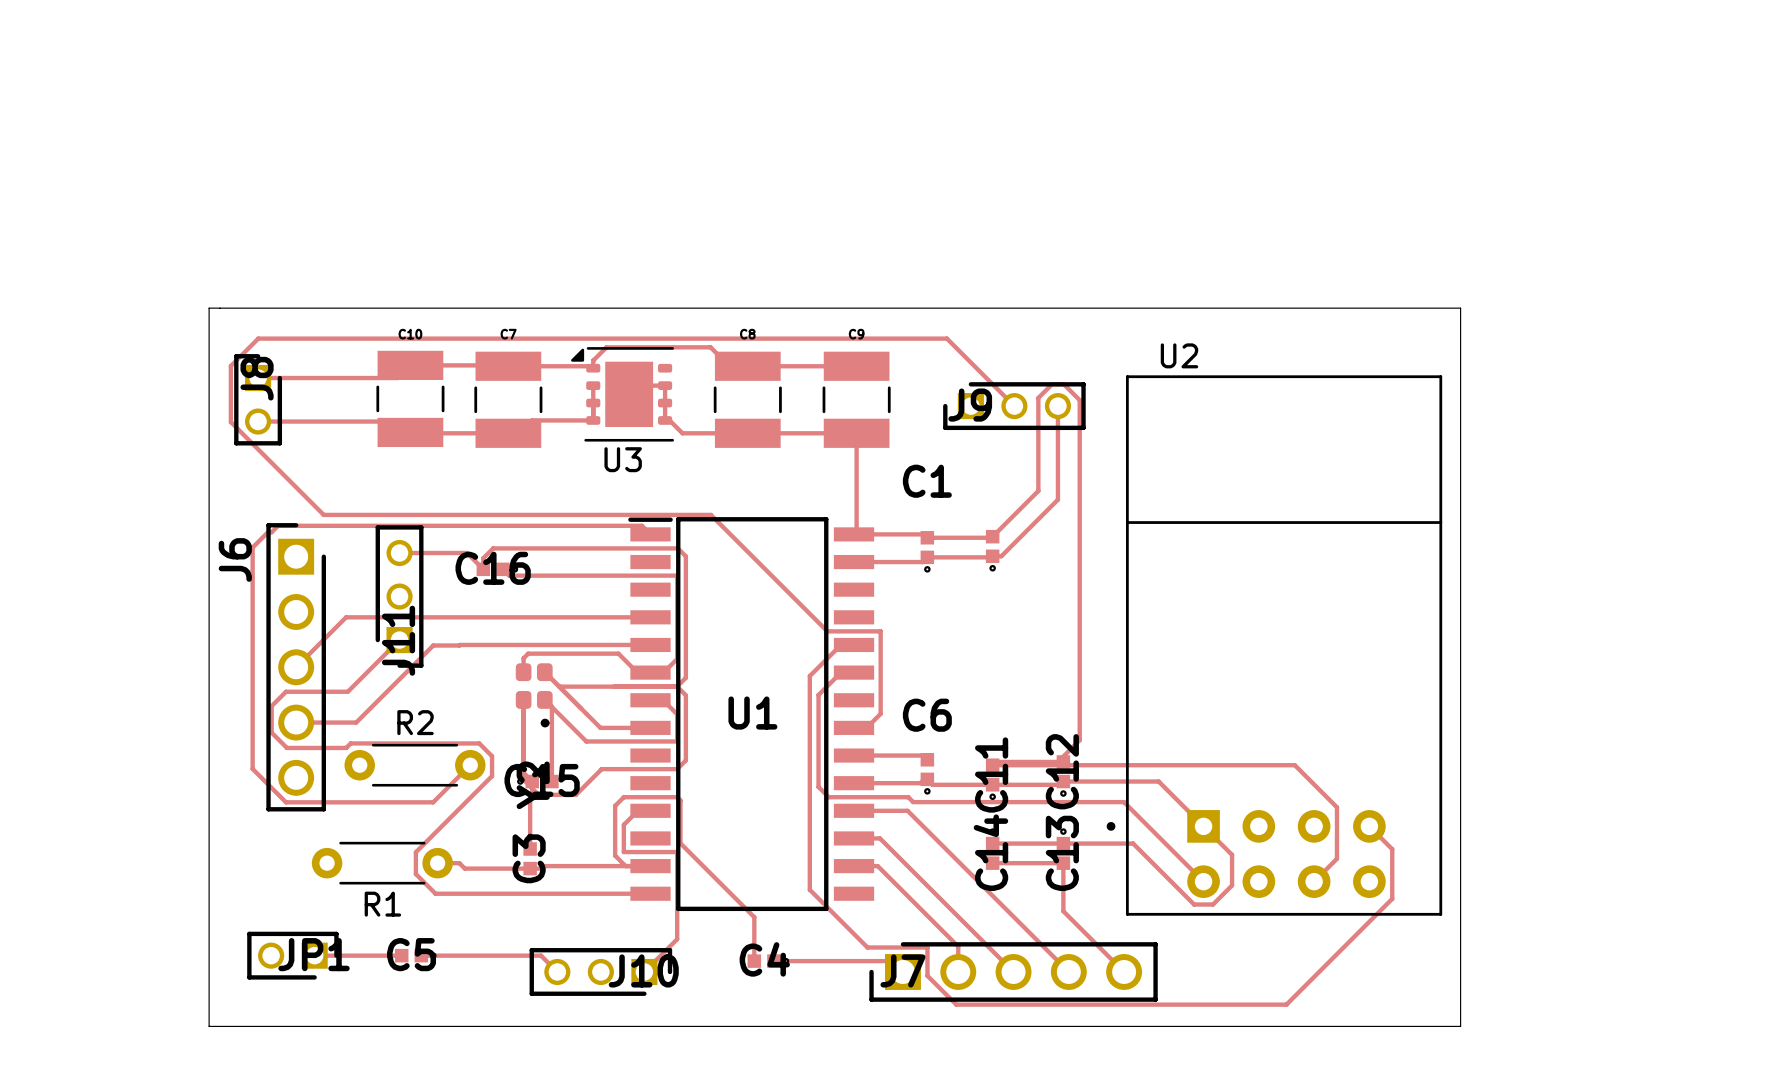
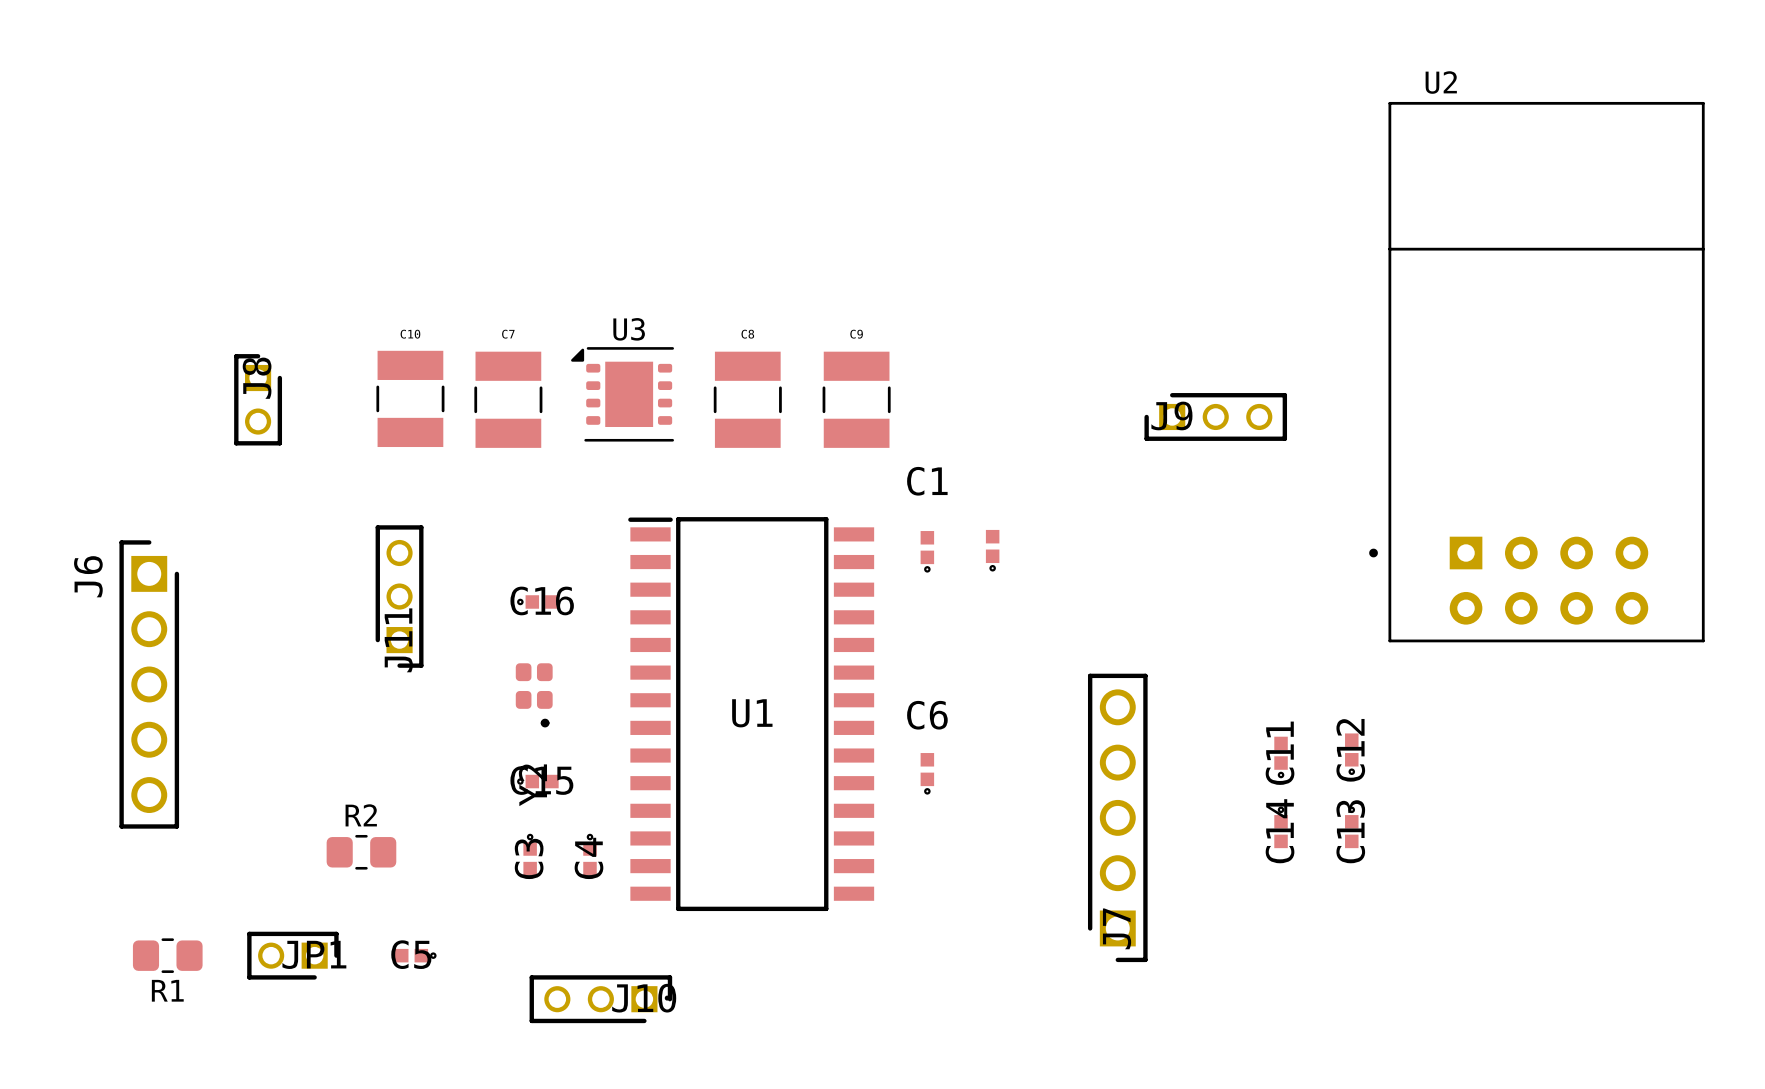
board edge: (209, 308) (1460, 308) (1460, 1026) (209, 1026) (209, 308) -> none
track: (856, 366) (729, 366) (710, 347) (606, 347) (593, 360) (593, 368) (591, 366) (410, 365) (397, 378) (258, 378) -> none
track: (593, 385) (593, 420) (532, 420) (519, 433) (410, 432) (399, 421) (258, 421) -> none
track: (629, 394) (637, 385) (665, 385) (665, 420) (669, 420) (682, 433) (856, 433) (856, 531) (854, 534) (923, 534) (927, 537) (991, 537) (1038, 490) (1038, 397) (1052, 384) (1063, 384) (1079, 400) (1079, 740) (1057, 761) -> none
track: (1014, 406) (946, 338) (258, 338) (230, 366) (230, 422) (323, 514) (710, 514) (827, 631) (880, 631) (880, 713) (866, 727) (854, 727) -> none
J9 position: (1014, 406) -> (1215, 416)
track: (1057, 406) (1057, 499) (1001, 556) (927, 557) (922, 562) (854, 562) -> none
U3 name position: U3 (623, 459) -> U3 (629, 329)
track: (650, 534) (641, 525) (278, 525) (271, 532) (267, 532) (252, 547) (252, 768) (286, 802) (433, 802) (470, 765) -> none
track: (399, 553) (467, 553) (483, 569) (483, 558) (493, 548) (677, 548) (685, 556) (685, 677) (677, 686) -> none
C16 rotation: 0° (497, 569) -> 180° (537, 601)
C16 position: (497, 569) -> (537, 601)
track: (502, 569) (509, 575) (677, 576) (677, 659) (663, 672) (637, 672) (618, 653) (528, 653) (523, 658) (523, 672) -> none
track: (650, 617) (346, 617) (296, 667) -> none
track: (399, 640) (347, 691) (286, 691) (271, 706) (271, 732) (286, 747) (346, 747) (350, 743) (479, 743) (492, 756) (492, 776) (415, 852) (415, 874) (435, 893) (650, 893) -> none
track: (650, 644) (433, 645) (356, 722) (296, 722) -> none
track: (854, 644) (840, 644) (809, 676) (809, 889) (867, 947) (927, 947) (927, 975) (956, 1004) (1286, 1004) (1392, 898) (1392, 849) (1369, 826) -> none
U2 position: (1274, 645) -> (1536, 372)
J6 position: (296, 667) -> (149, 684)
track: (544, 672) (600, 727) (650, 727) -> none
track: (854, 672) (840, 672) (818, 695) (818, 786) (828, 797) (908, 797) (913, 802) (1124, 802) (1203, 881) -> none
track: (559, 686) (677, 686) -> none
track: (677, 686) (685, 695) (685, 760) (677, 769) (601, 769) (576, 794) (538, 794) (523, 779) (523, 699) -> none
track: (544, 699) (586, 741) (677, 741) (677, 714) (663, 700) (650, 700) -> none
track: (551, 707) (551, 781) -> none
R2 footprint: [344, 743, 486, 787] -> [326, 834, 397, 870]
track: (854, 755) (923, 755) (927, 759) -> none
track: (1063, 761) (995, 761) (992, 765) (1294, 765) (1336, 807) (1336, 858) (1314, 881) -> none
track: (523, 772) (532, 781) (532, 794) (530, 796) (530, 849) -> none
C12 position: (1063, 775) -> (1351, 754)
C11 position: (992, 779) -> (1281, 757)
track: (854, 783) (920, 783) (924, 779) (927, 779) (932, 784) (1060, 784) (1063, 781) (1158, 781) (1232, 854) (1232, 885) (1213, 904) (1194, 904) (1133, 843) (992, 843) -> none
track: (650, 810) (637, 810) (623, 824) (623, 852) (677, 852) (677, 939) (644, 971) -> none
track: (854, 810) (907, 810) (1068, 971) -> none
track: (854, 838) (880, 838) (1013, 971) -> none
R1 footprint: [311, 841, 453, 885] -> [132, 938, 203, 973]
C14 position: (992, 849) -> (1281, 827)
C13 position: (1063, 849) -> (1351, 827)
track: (437, 863) (459, 863) (464, 868) (650, 866) -> none
track: (992, 863) (1063, 863) (1063, 911) (1124, 971) -> none
track: (625, 866) (615, 855) (615, 805) (623, 797) (677, 797) (680, 800) (680, 843) (754, 917) (754, 961) -> none
track: (854, 866) (877, 866) (958, 946) (958, 971) -> none
track: (314, 955) (401, 955) -> none
track: (421, 955) (541, 955) (557, 971) -> none
C4 rotation: 0° (768, 961) -> 90° counterclockwise (589, 854)
C4 position: (768, 961) -> (589, 854)
track: (773, 961) (892, 961) (902, 971) -> none
J10 position: (600, 971) -> (600, 999)
J7 rotation: 0° (1013, 971) -> 90° counterclockwise (1117, 817)
J7 position: (1013, 971) -> (1117, 817)

